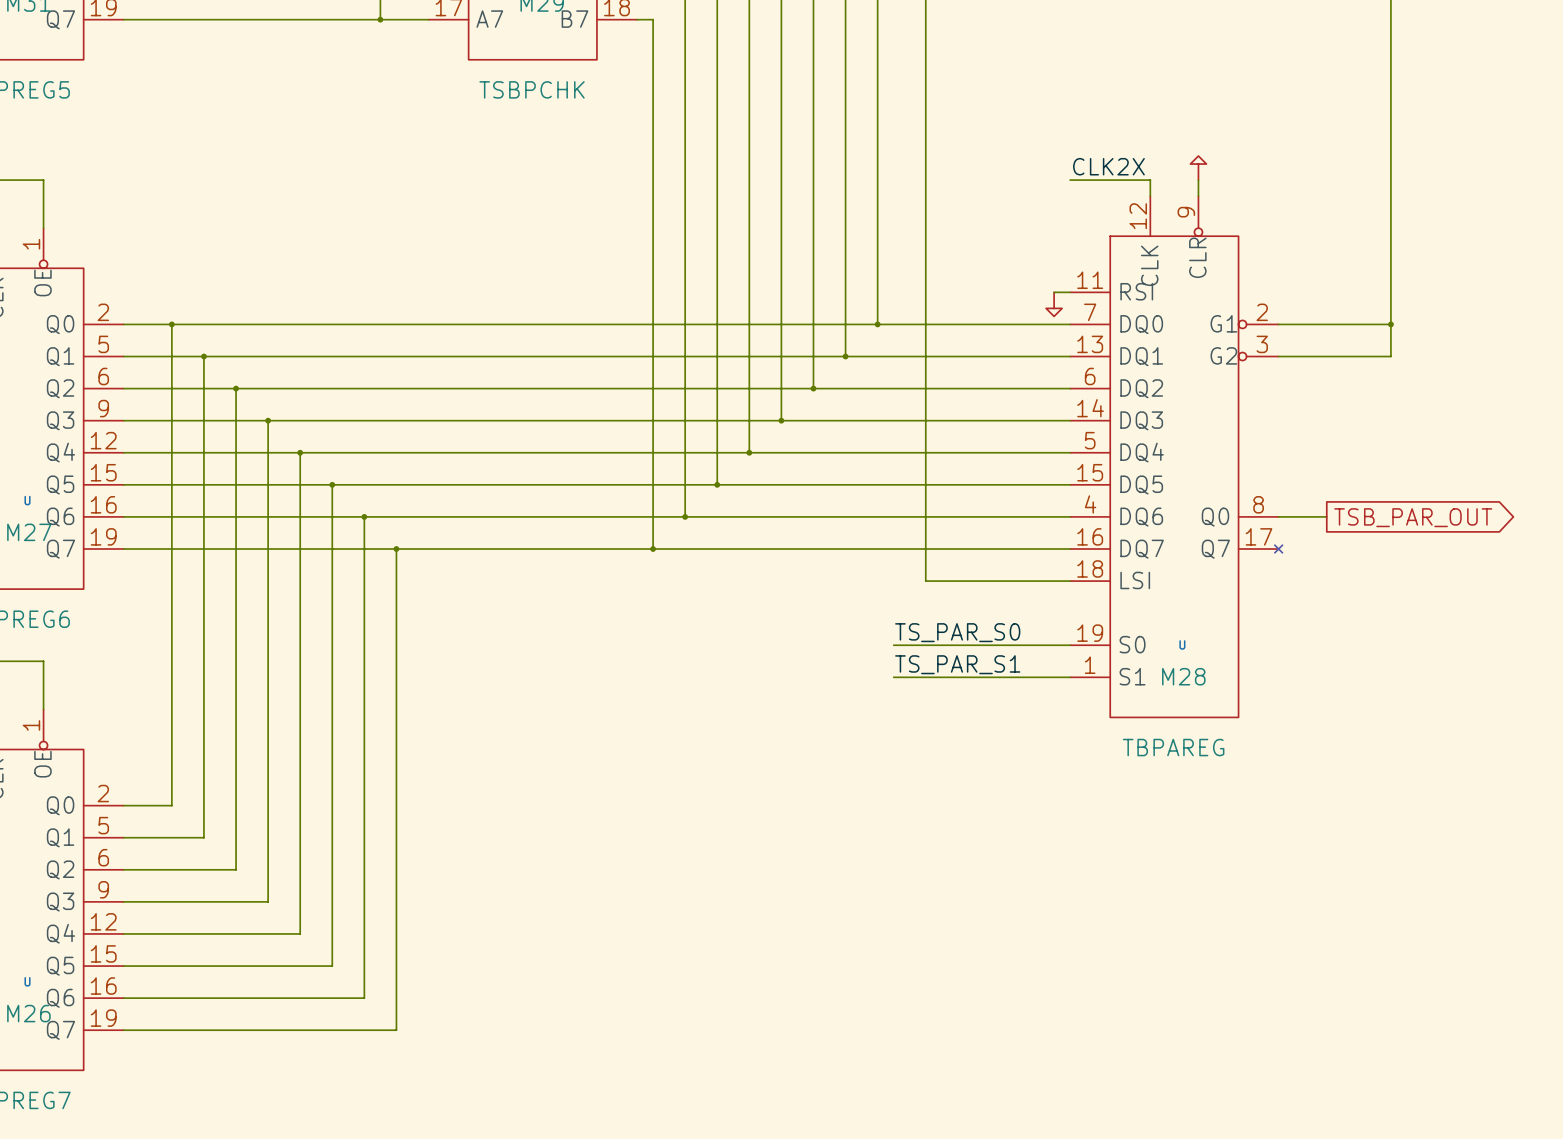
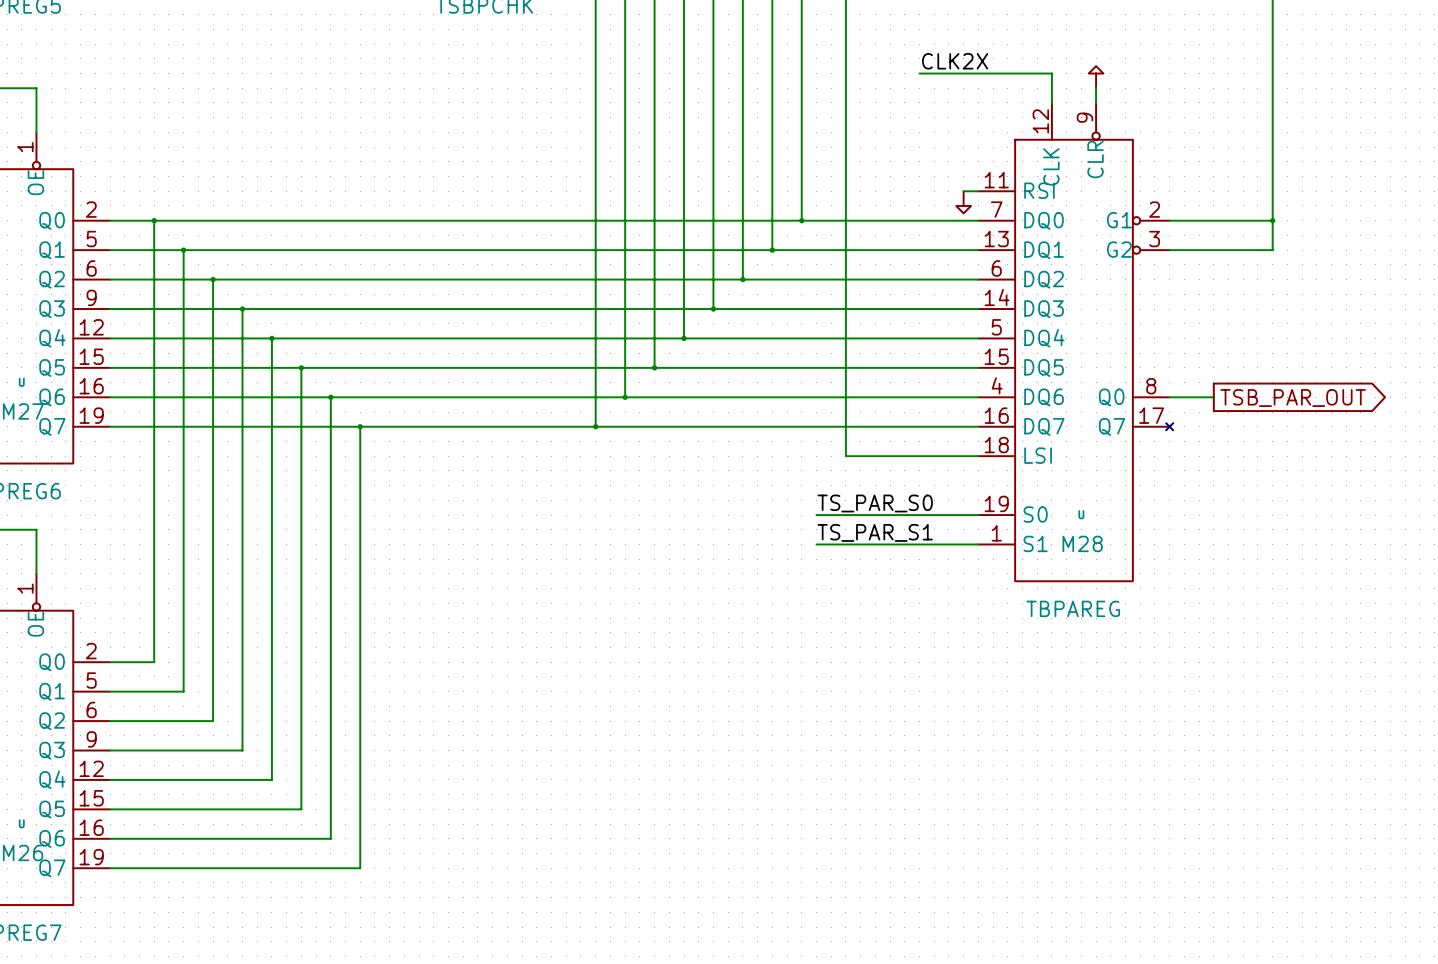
label position: CLK2X (1108, 166) -> CLK2X (955, 61)
wire: (1070, 180) (1150, 180) -> (919, 73) (1051, 73) (1051, 88)

